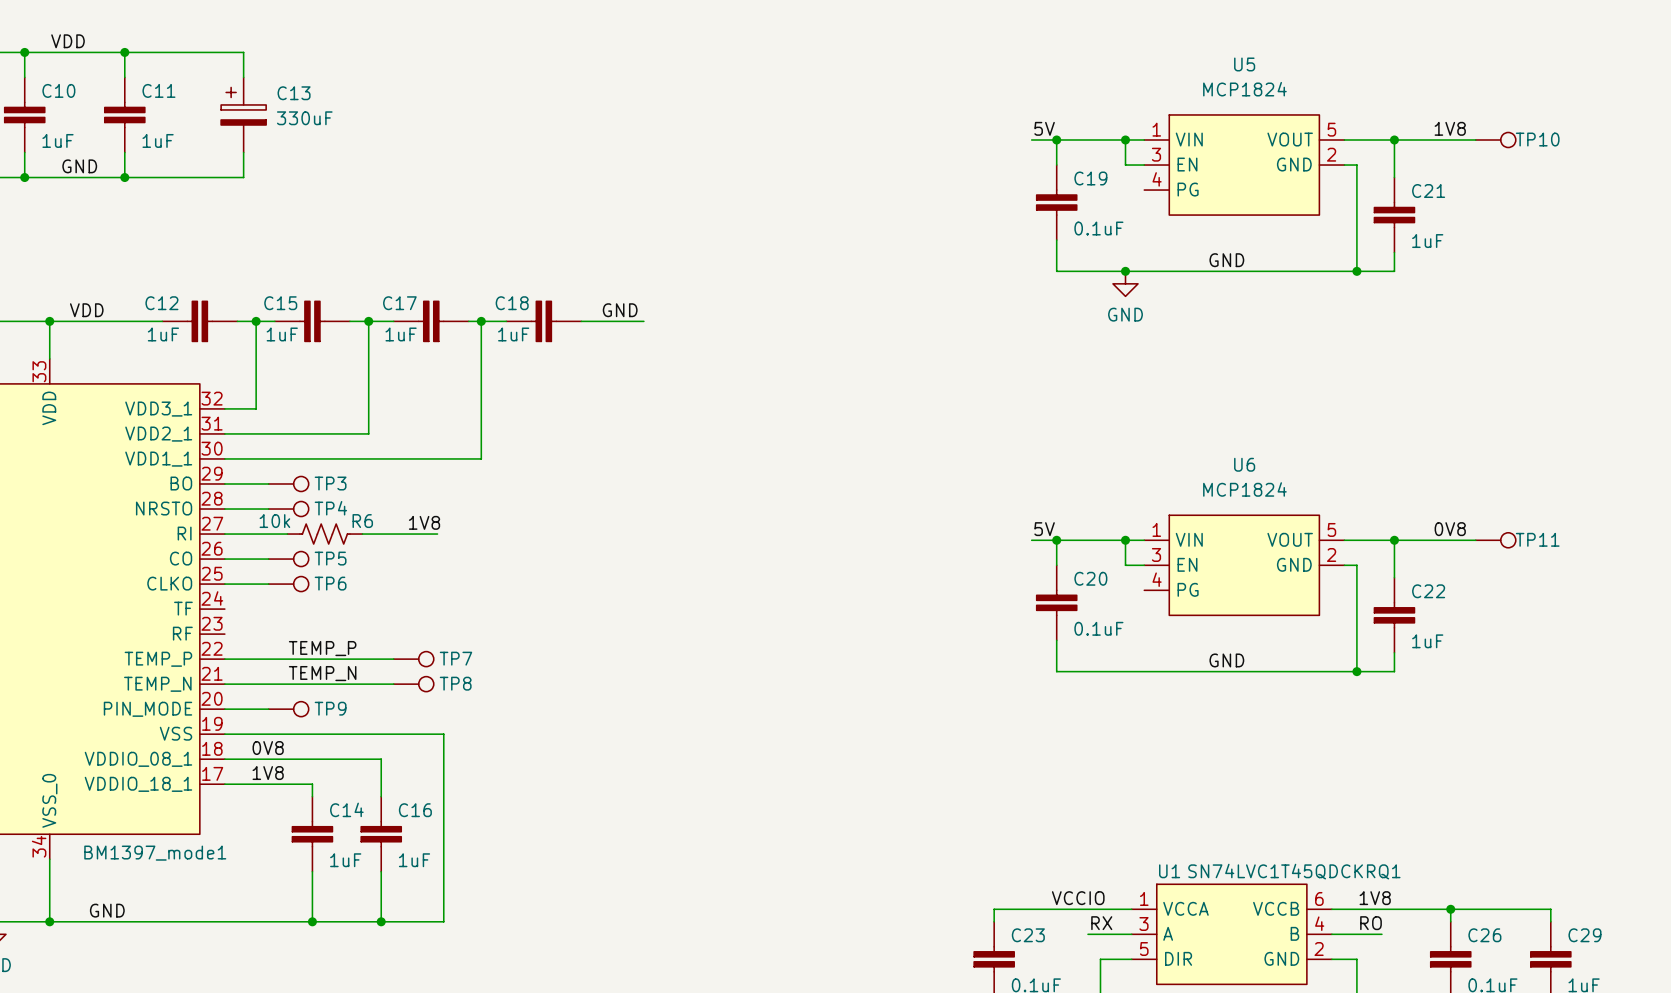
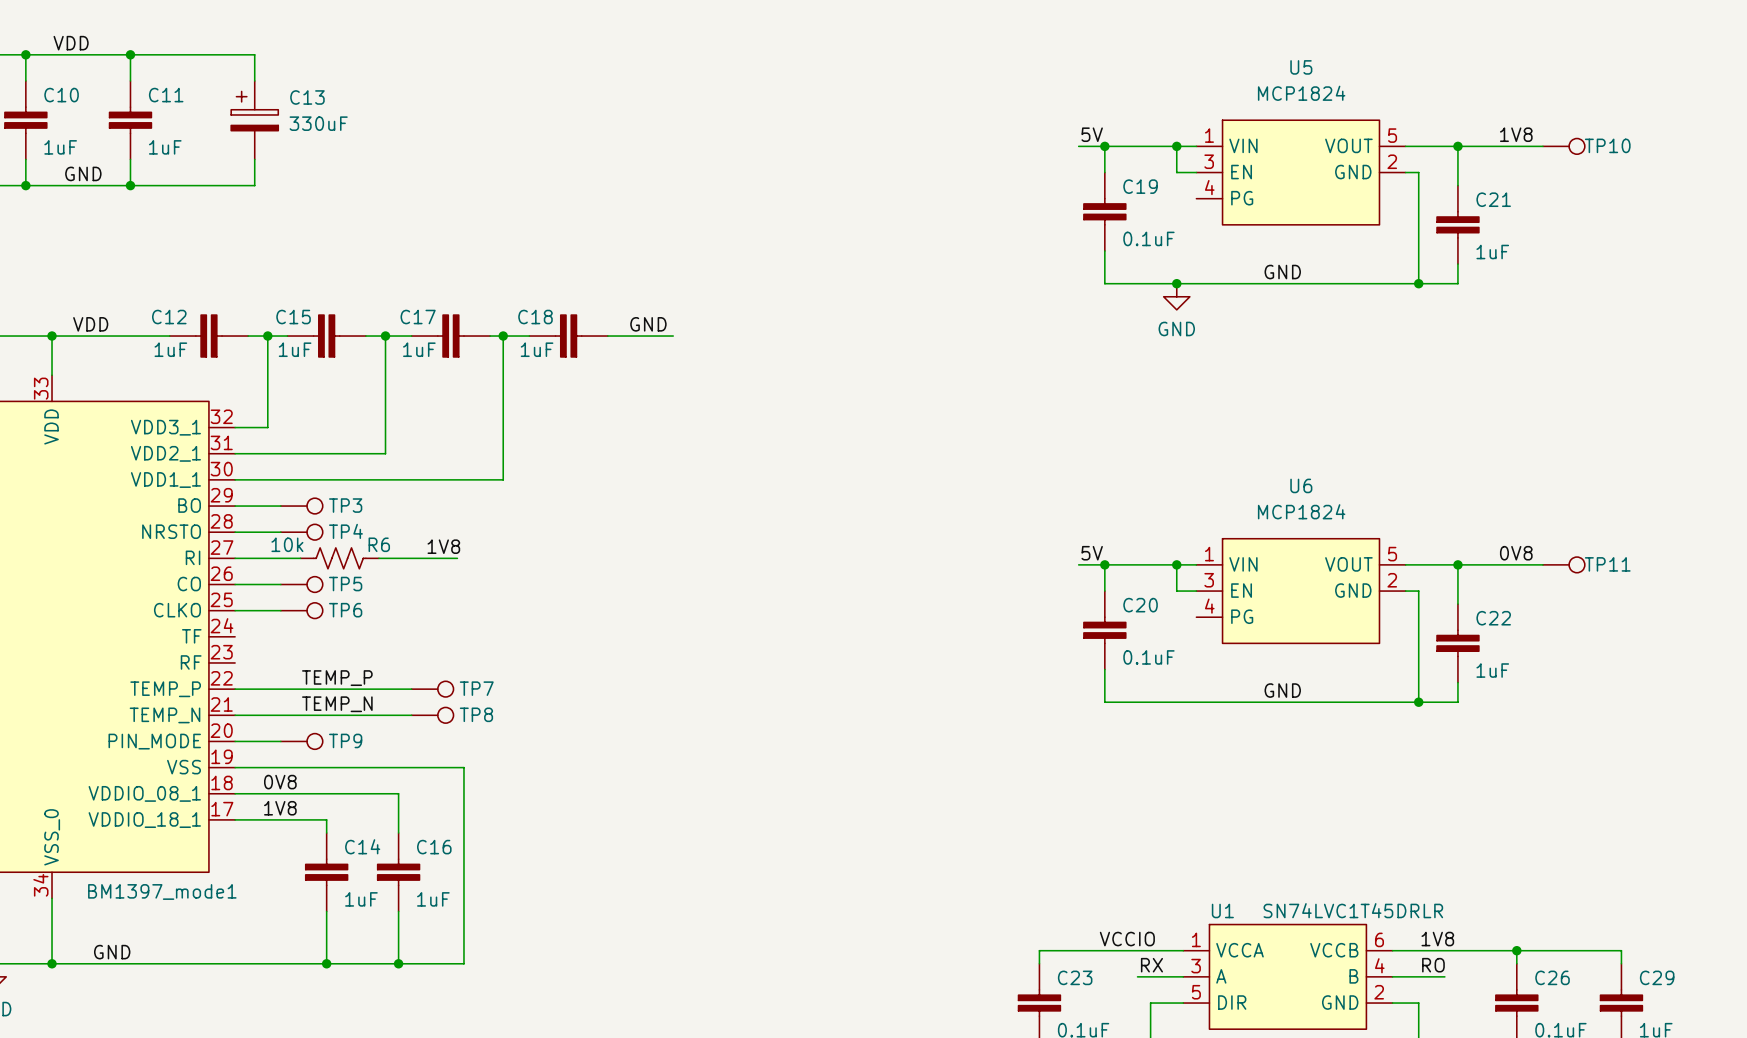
U1 value: SN74LVC1T45QDCKRQ1 (1294, 871) -> SN74LVC1T45DRLR (1353, 910)

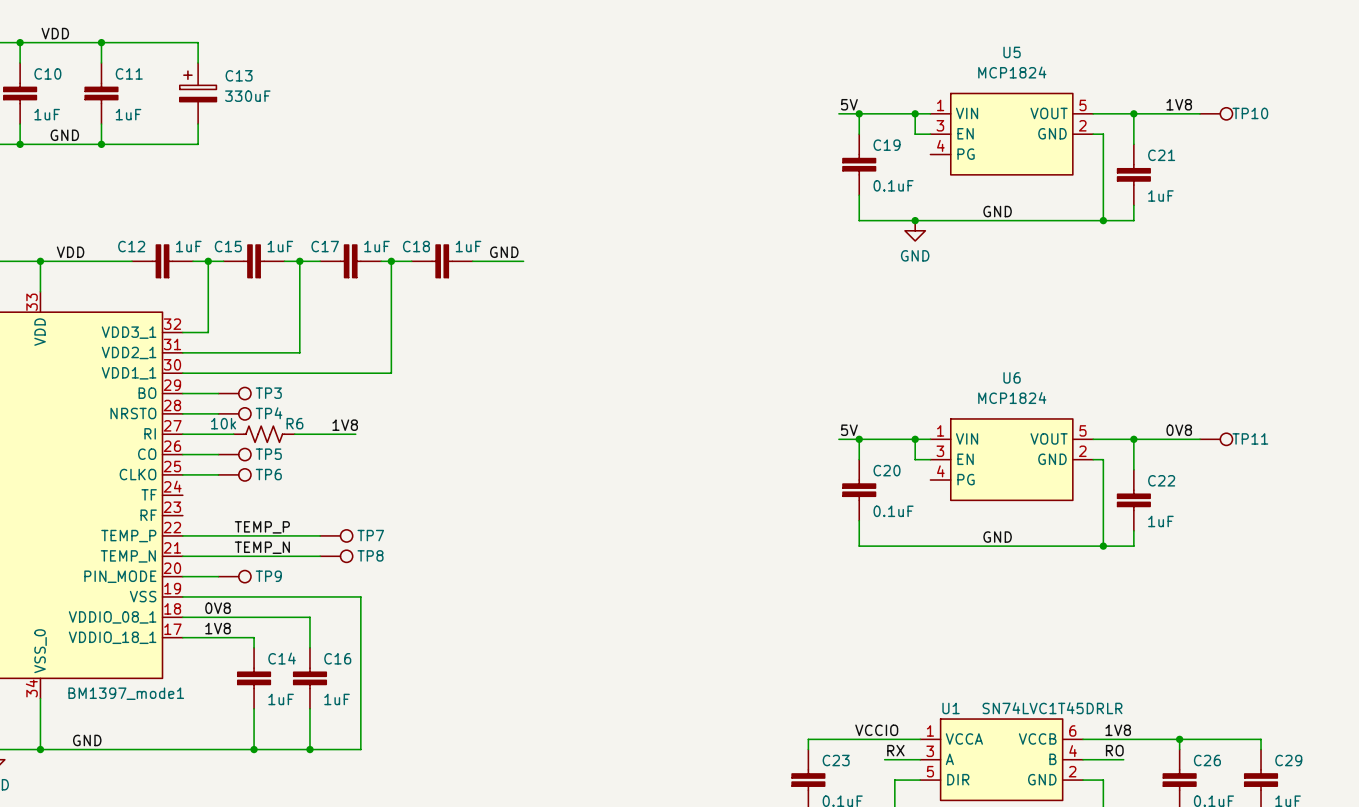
C12 value position: 1uF (170, 349) -> 1uF (188, 246)
C15 value position: 1uF (295, 349) -> 1uF (280, 246)
C17 value position: 1uF (419, 349) -> 1uF (376, 246)
C18 value position: 1uF (537, 349) -> 1uF (468, 246)

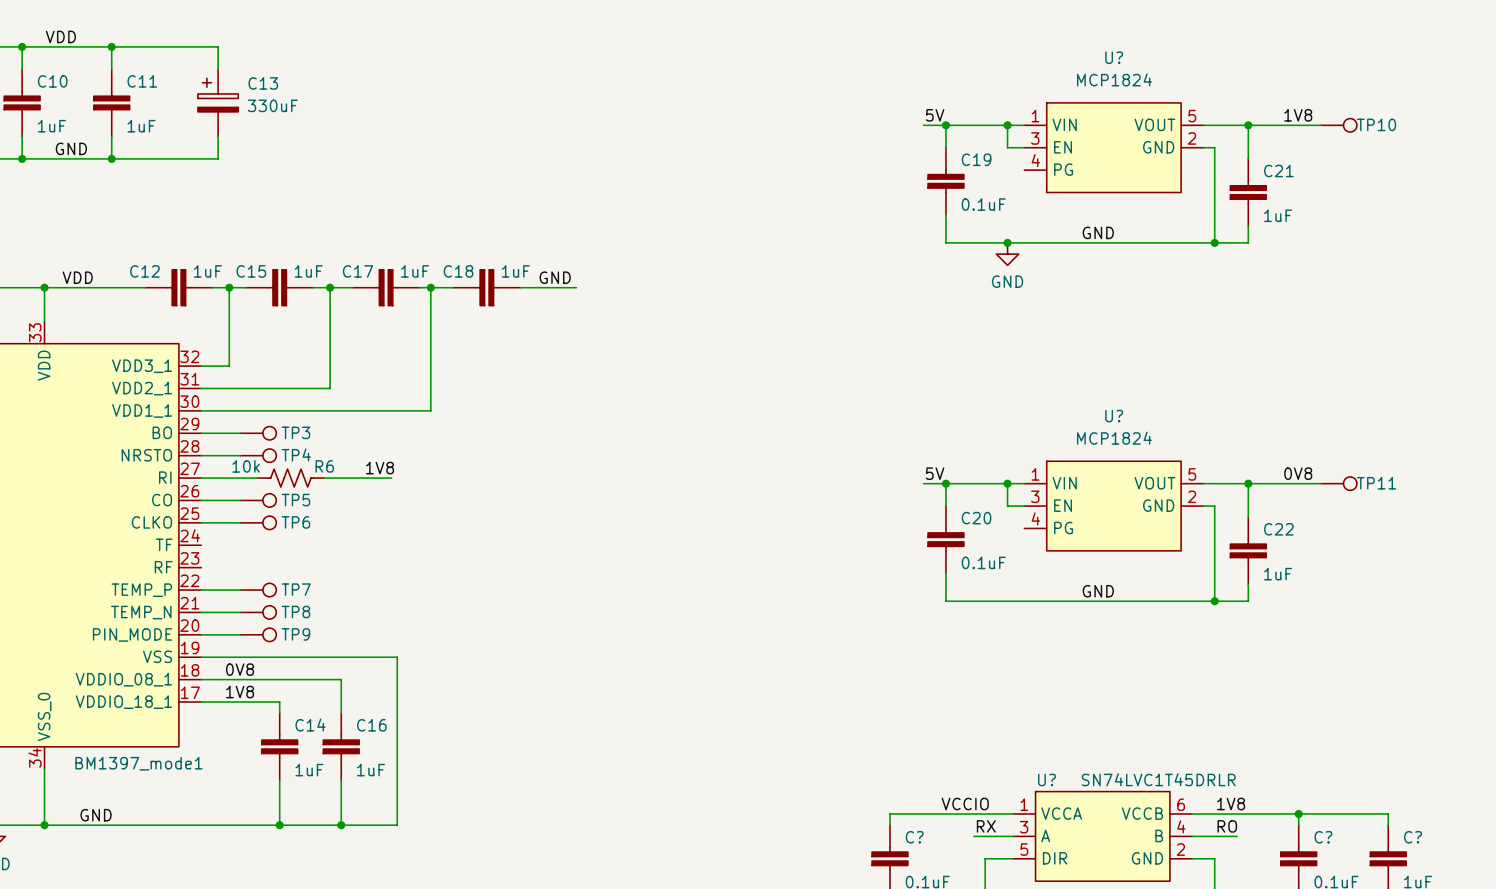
U5 name: U5 (1012, 52) -> U? (1114, 57)
U6 name: U6 (1012, 377) -> U? (1114, 416)
label: TEMP_P (262, 527) -> none
wire: (218, 535) (320, 535) -> none
TP7 position: (336, 535) -> (258, 590)
label: TEMP_N (262, 547) -> none
wire: (218, 556) (320, 556) -> none
TP8 position: (336, 556) -> (258, 612)
U1 name: U1 (951, 708) -> U? (1047, 779)
C23 name: C23 (836, 760) -> C? (914, 837)
C26 name: C26 (1207, 760) -> C? (1323, 837)
C29 name: C29 (1288, 760) -> C? (1413, 837)

